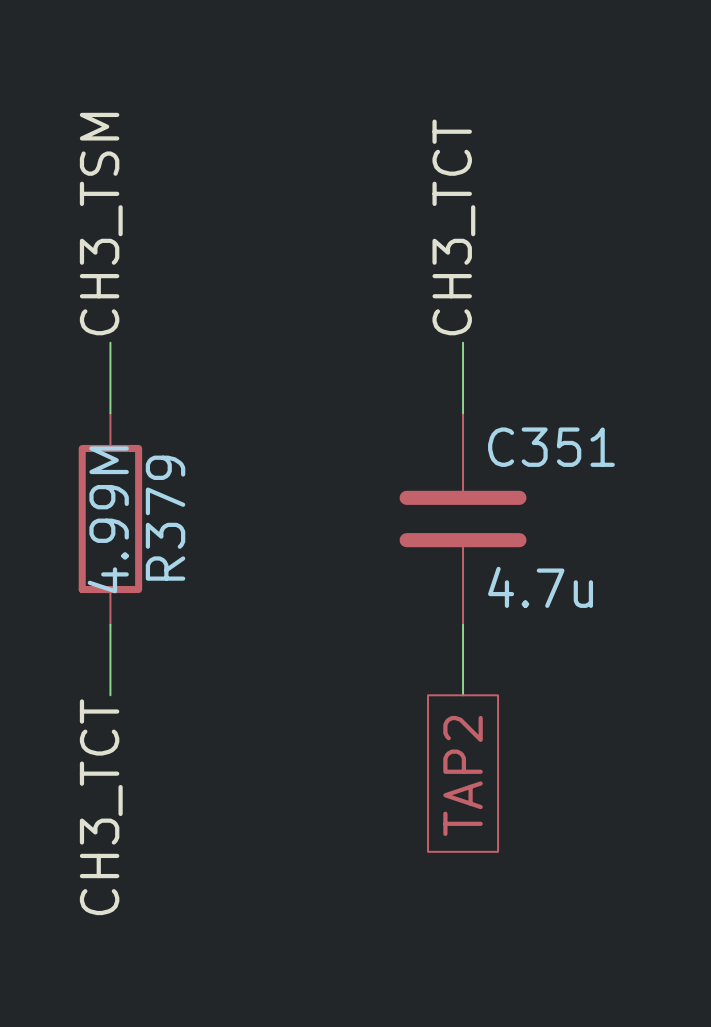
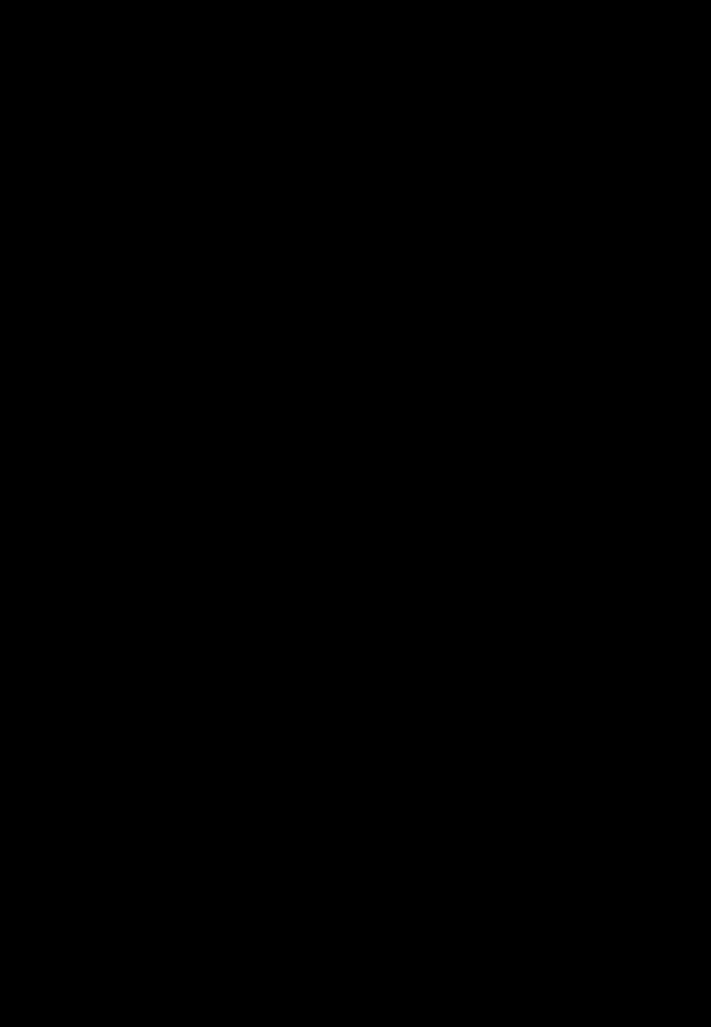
label: CH3_TSM (101, 224) -> none
label: CH3_TCT (453, 227) -> none
wire: (110, 342) (110, 413) -> none
wire: (463, 342) (463, 413) -> none
R379: 4.99M (110, 519) -> none
C351: 4.7u (463, 519) -> none
wire: (110, 624) (110, 695) -> none
wire: (463, 624) (463, 695) -> none
global label: TAP2 (463, 775) -> none
label: CH3_TCT (101, 807) -> none

